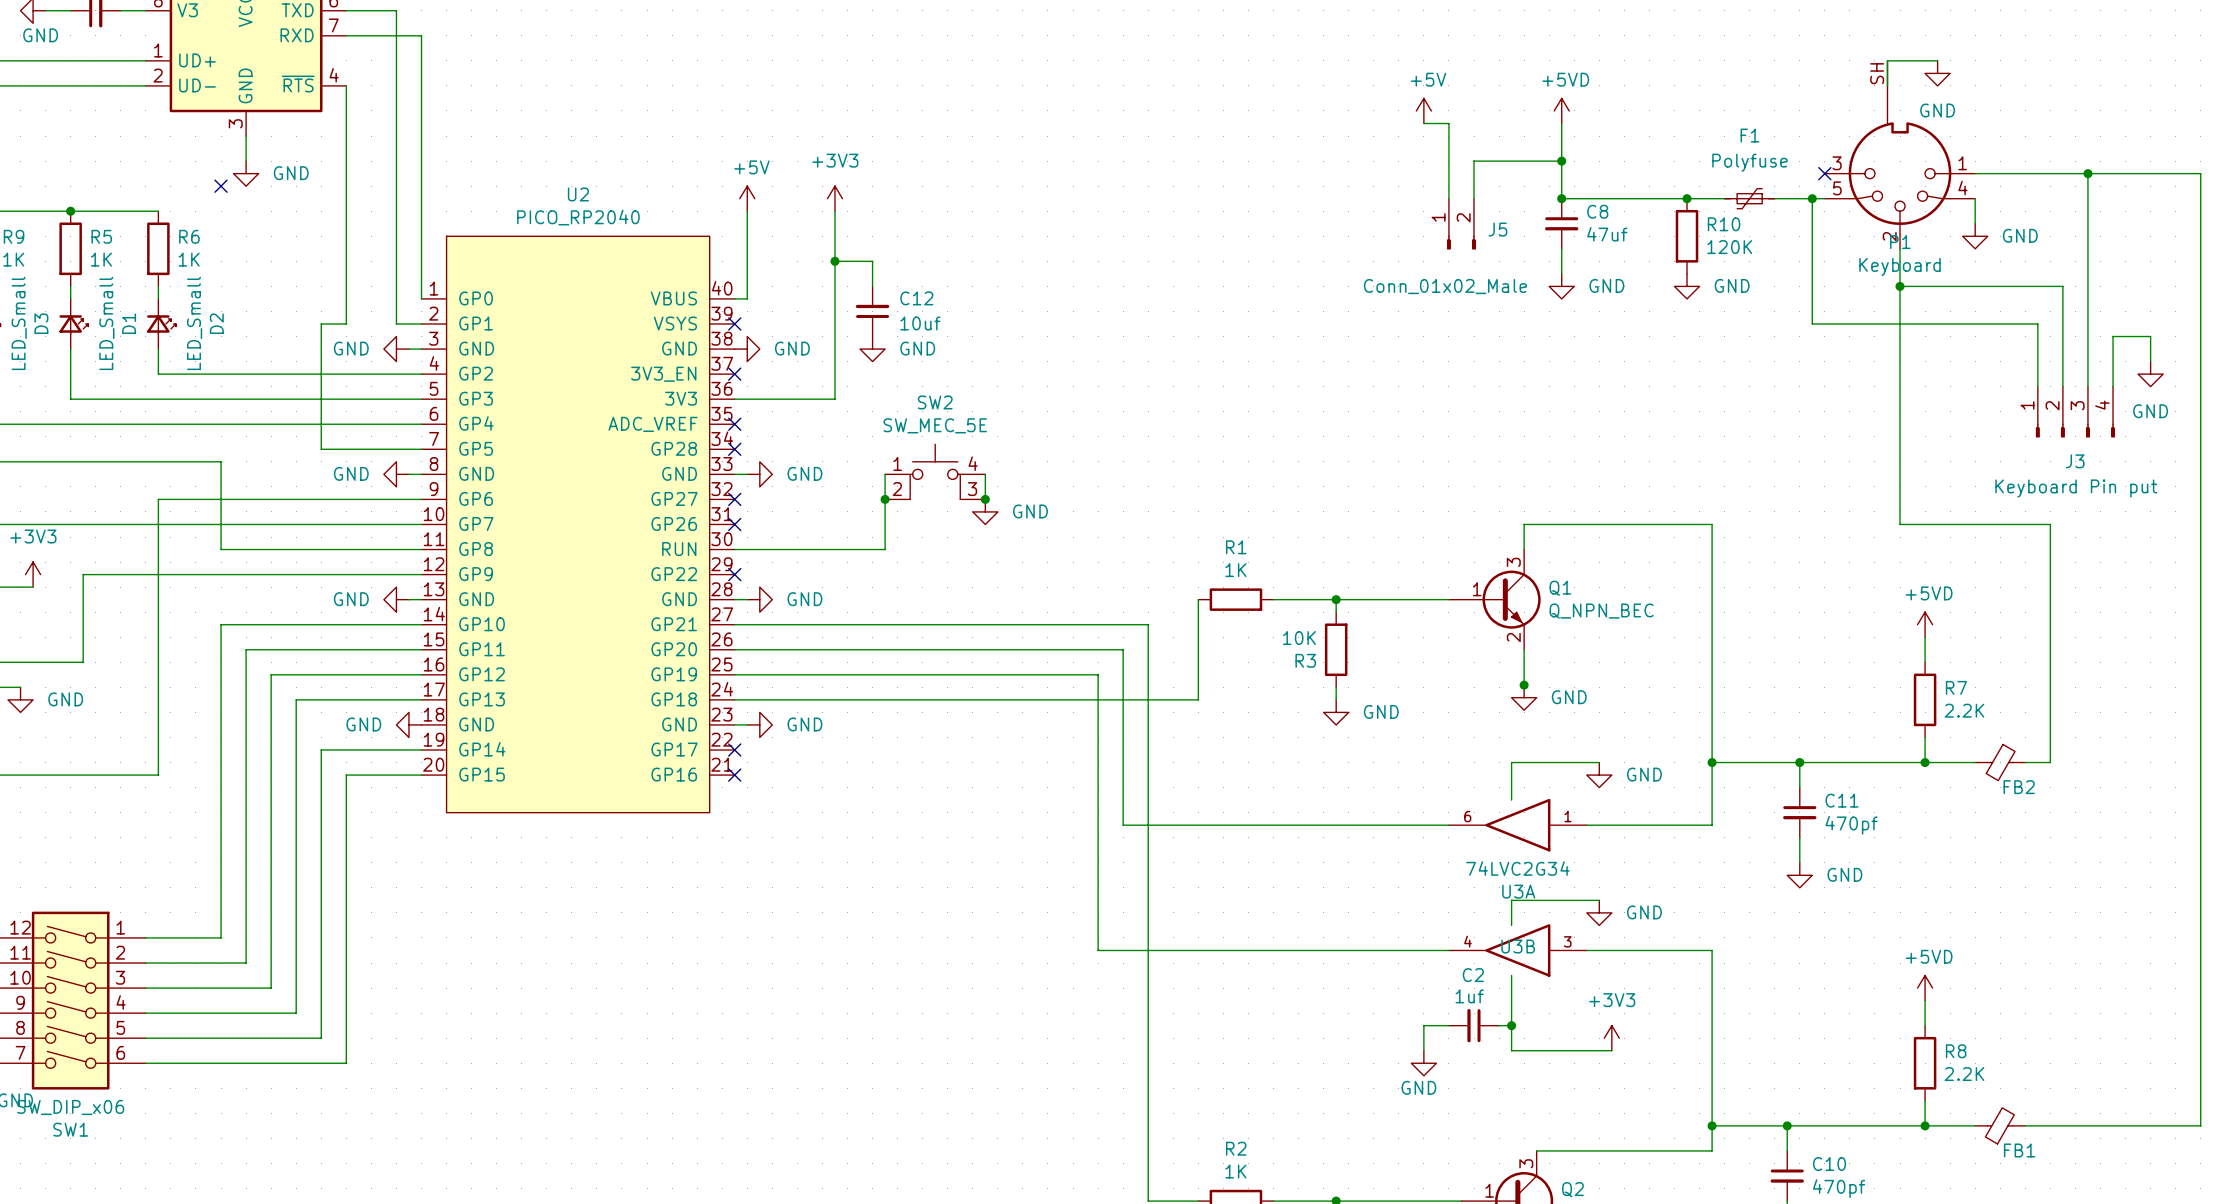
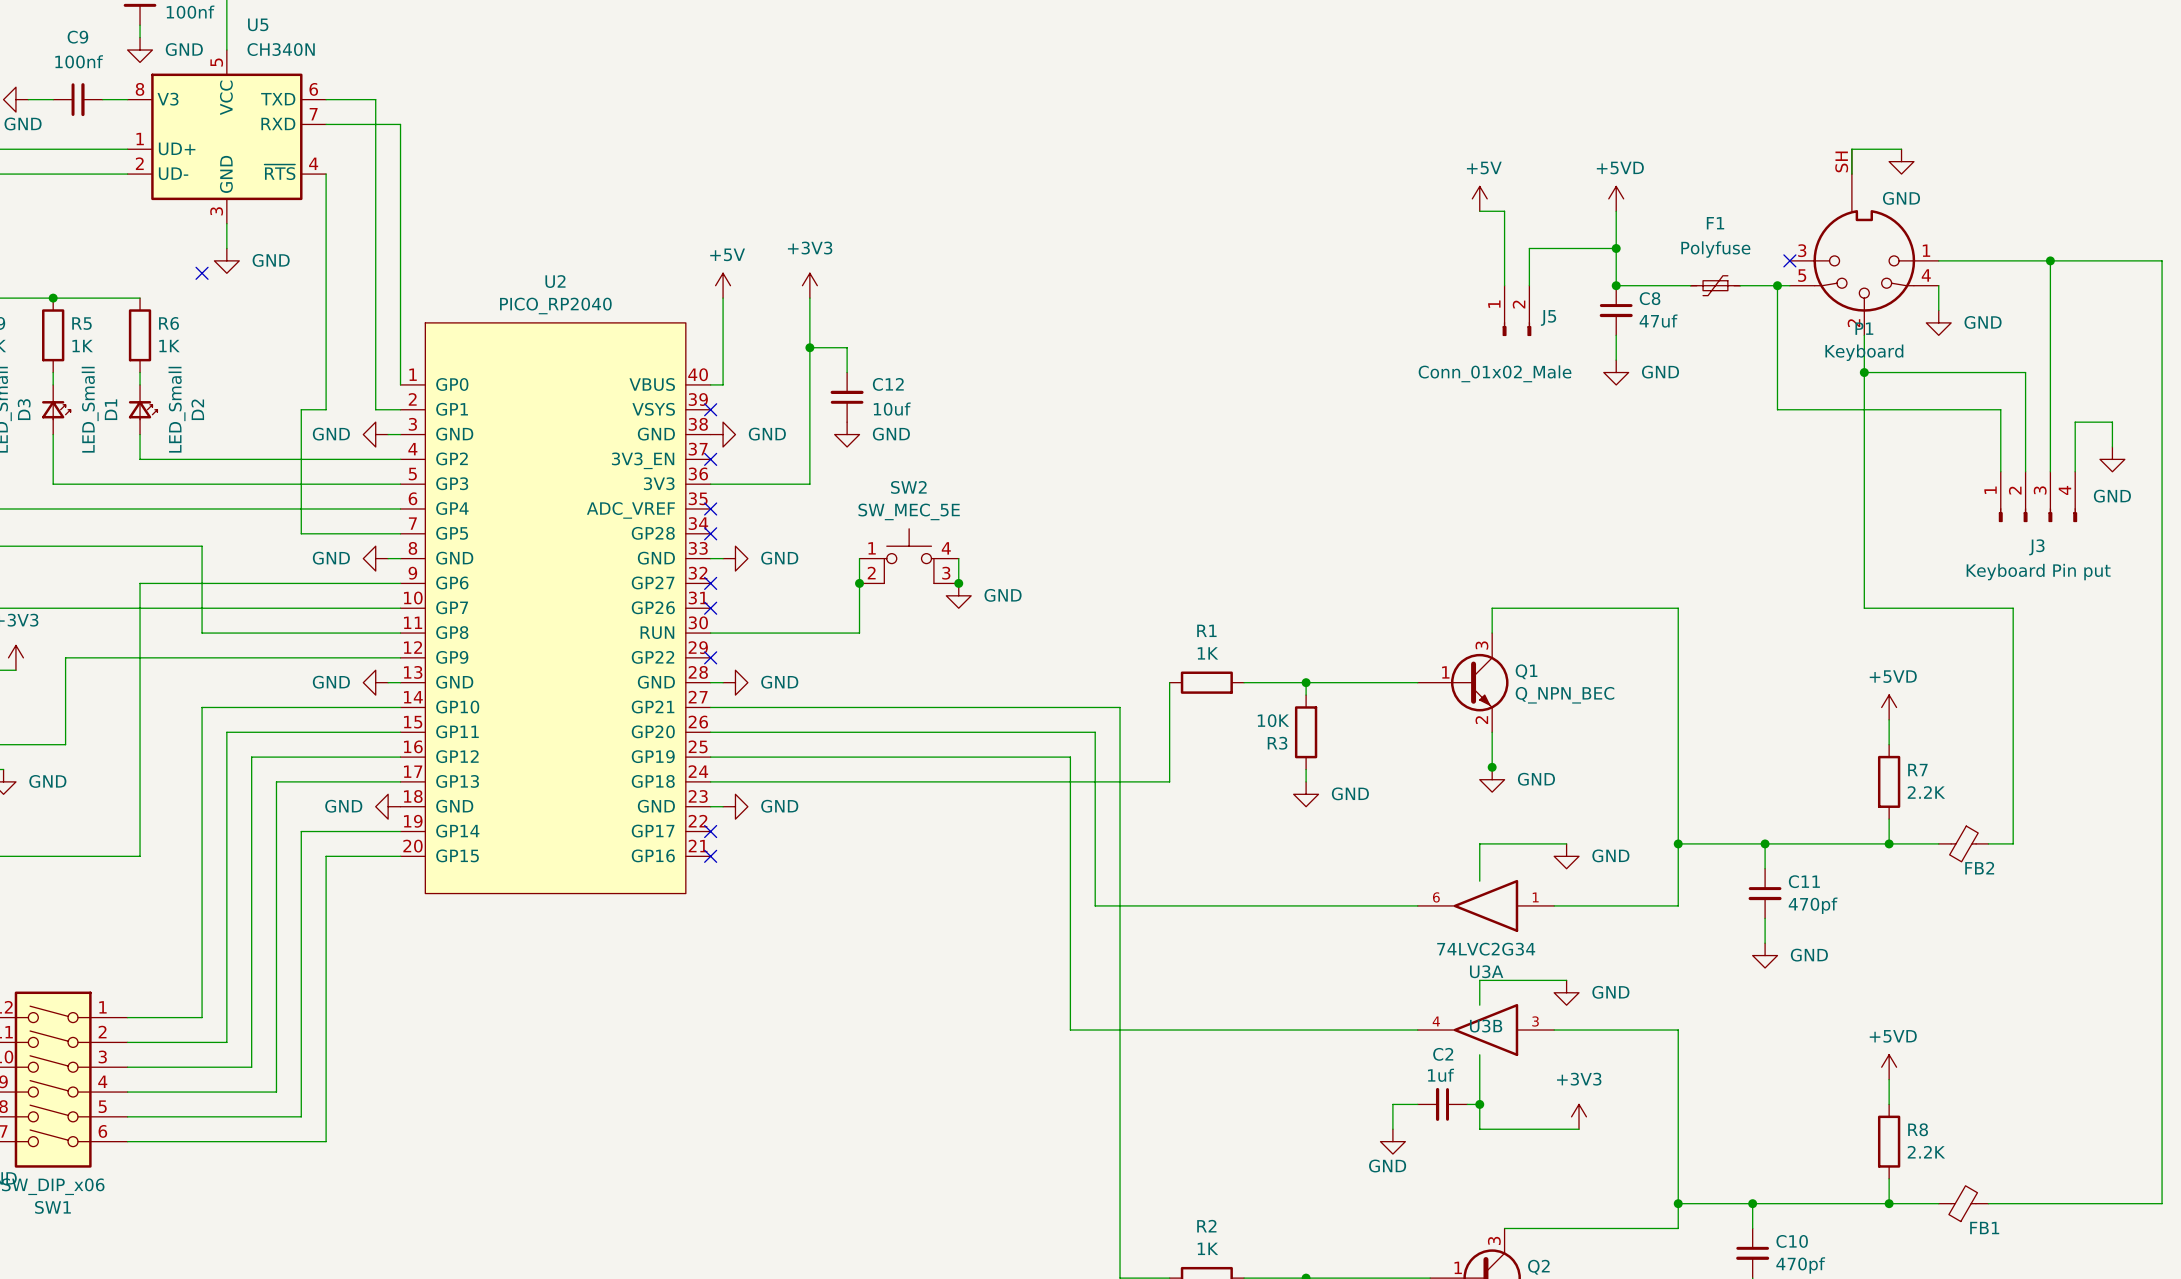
power symbol position: +5V (1423, 110) -> +5V (1479, 198)
power symbol position: +5VD (1561, 110) -> +5VD (1616, 198)
wire: (1423, 123) (1448, 123) (1448, 198) -> (1479, 211) (1504, 211) (1504, 285)
wire: (1561, 123) (1561, 161) (1474, 161) (1474, 198) -> none
wire: none -> (1529, 248) (1616, 248)
junction: (1561, 161) -> none
junction: none -> (1616, 248)
wire: (1561, 198) (1649, 198) -> (1616, 211) (1616, 285)
junction: (1561, 198) -> none
junction: none -> (1616, 285)
junction: (1687, 198) -> none
C8 position: (1561, 223) -> (1616, 310)
J5 position: (1461, 224) -> (1516, 310)
R10: 120K (1687, 236) -> none
wire: (1561, 248) (1561, 273) -> (1616, 335) (1616, 360)
power symbol: GND (1561, 286) -> none
power symbol position: GND (1687, 286) -> GND (1616, 372)

